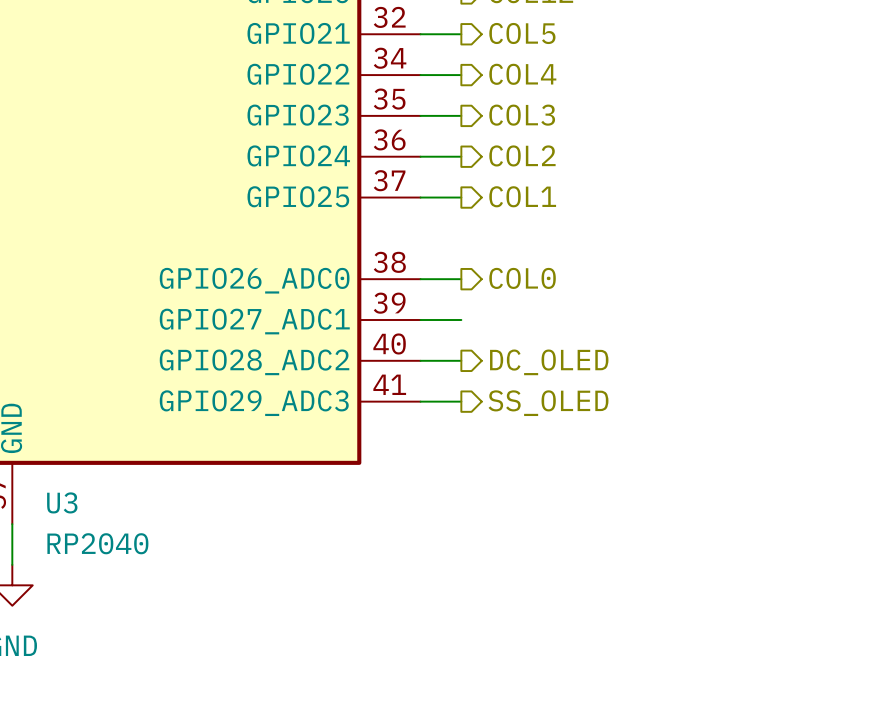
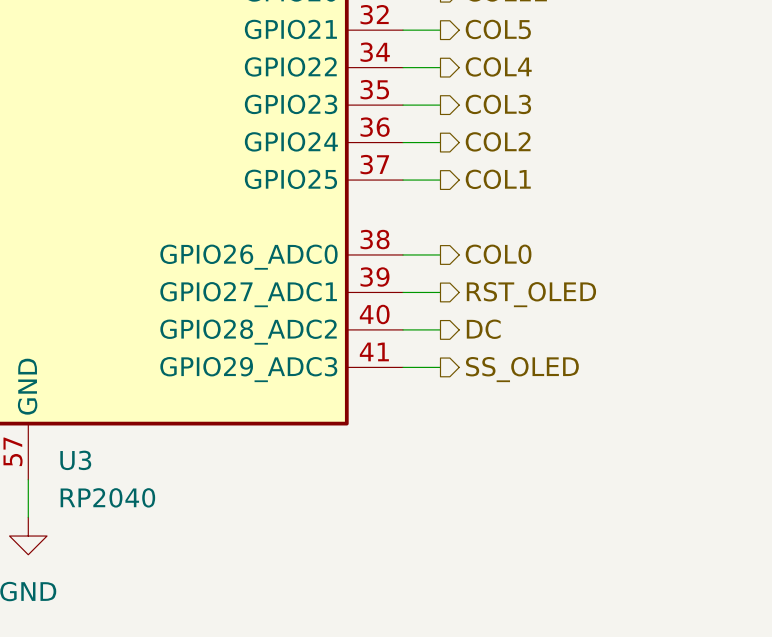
hierarchical label: none -> RST_OLED (531, 294)
hierarchical label: DC_OLED (549, 362) -> DC (483, 329)

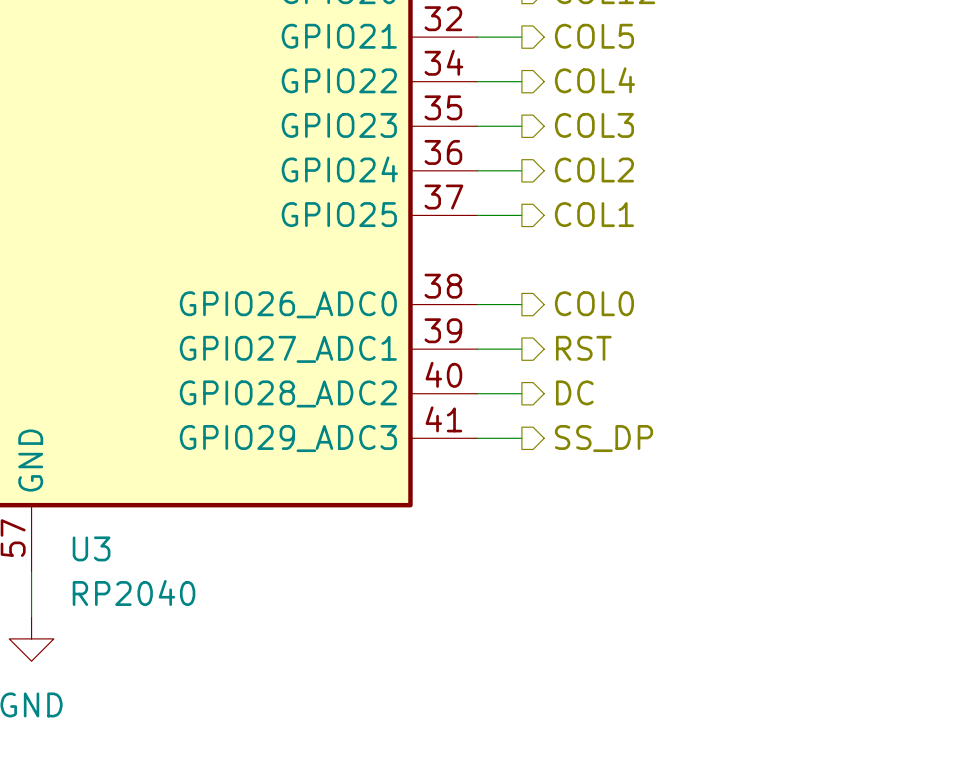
hierarchical label: RST_OLED (531, 294) -> RST (583, 348)
hierarchical label: SS_OLED (522, 369) -> SS_DP (603, 438)

